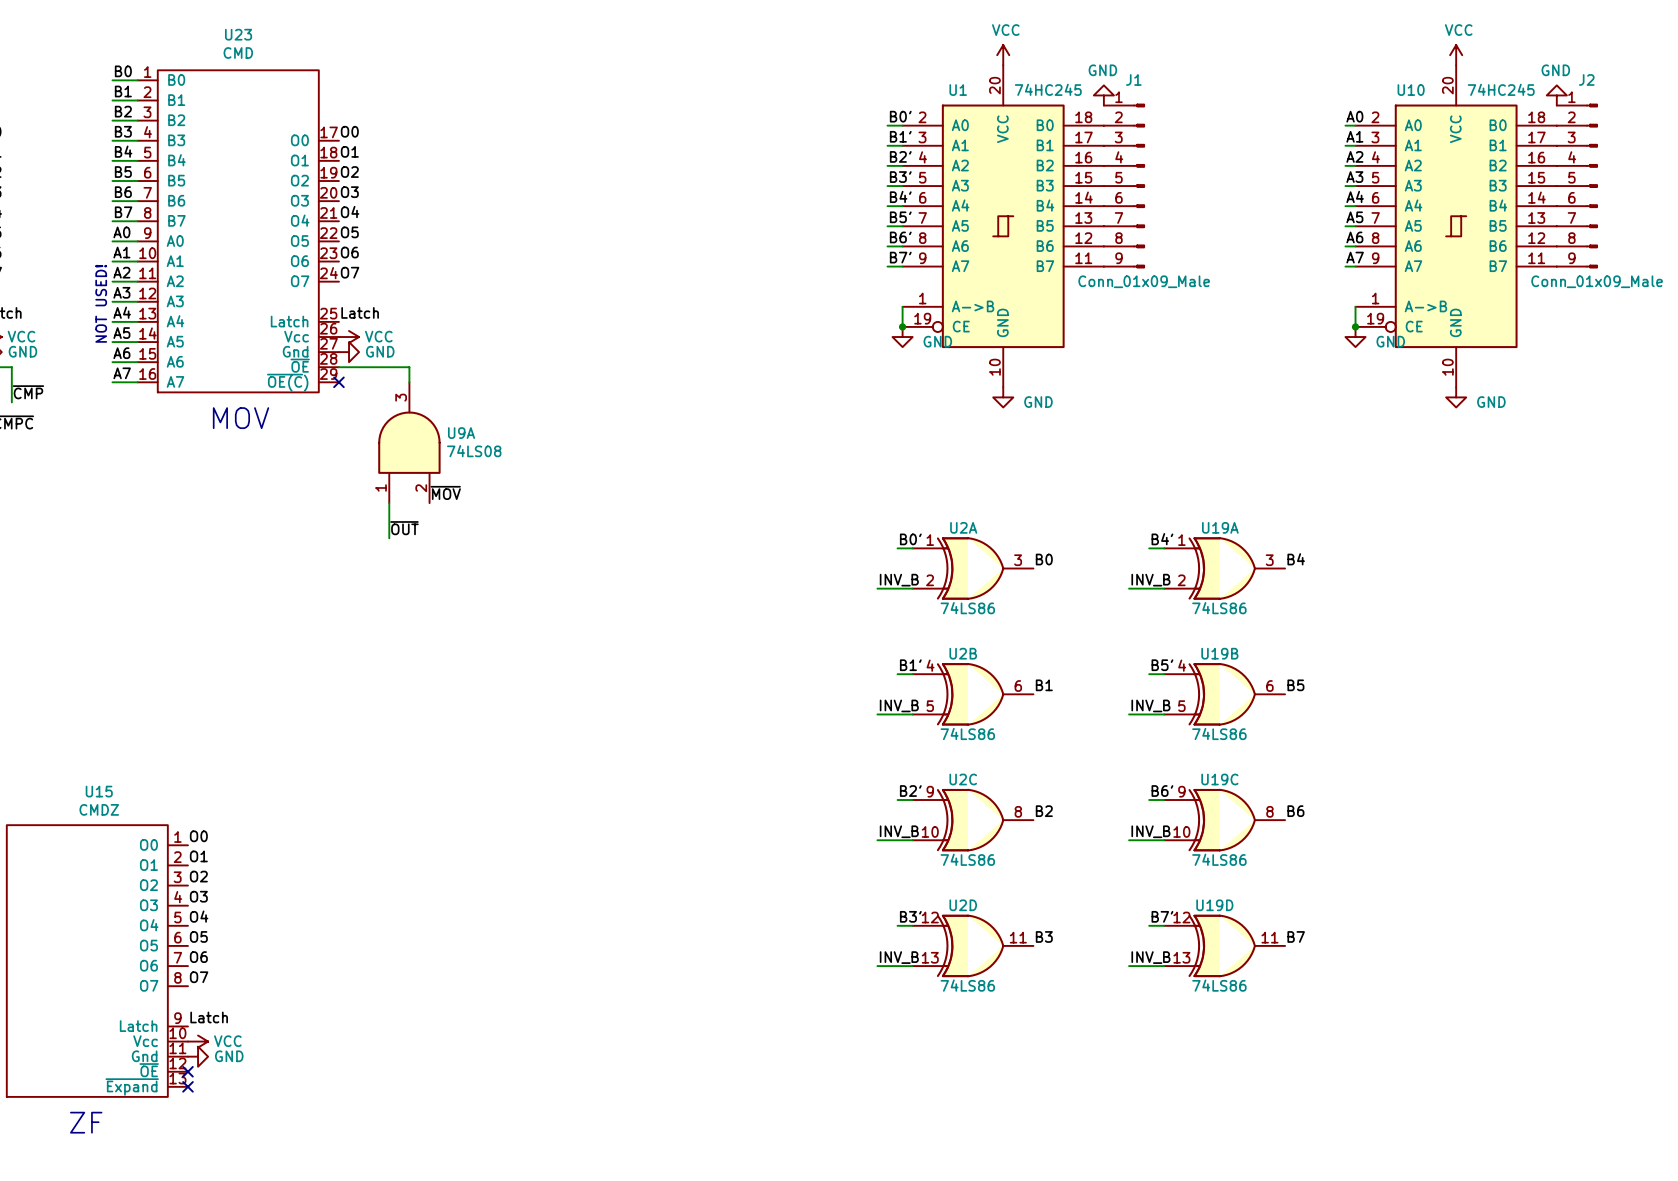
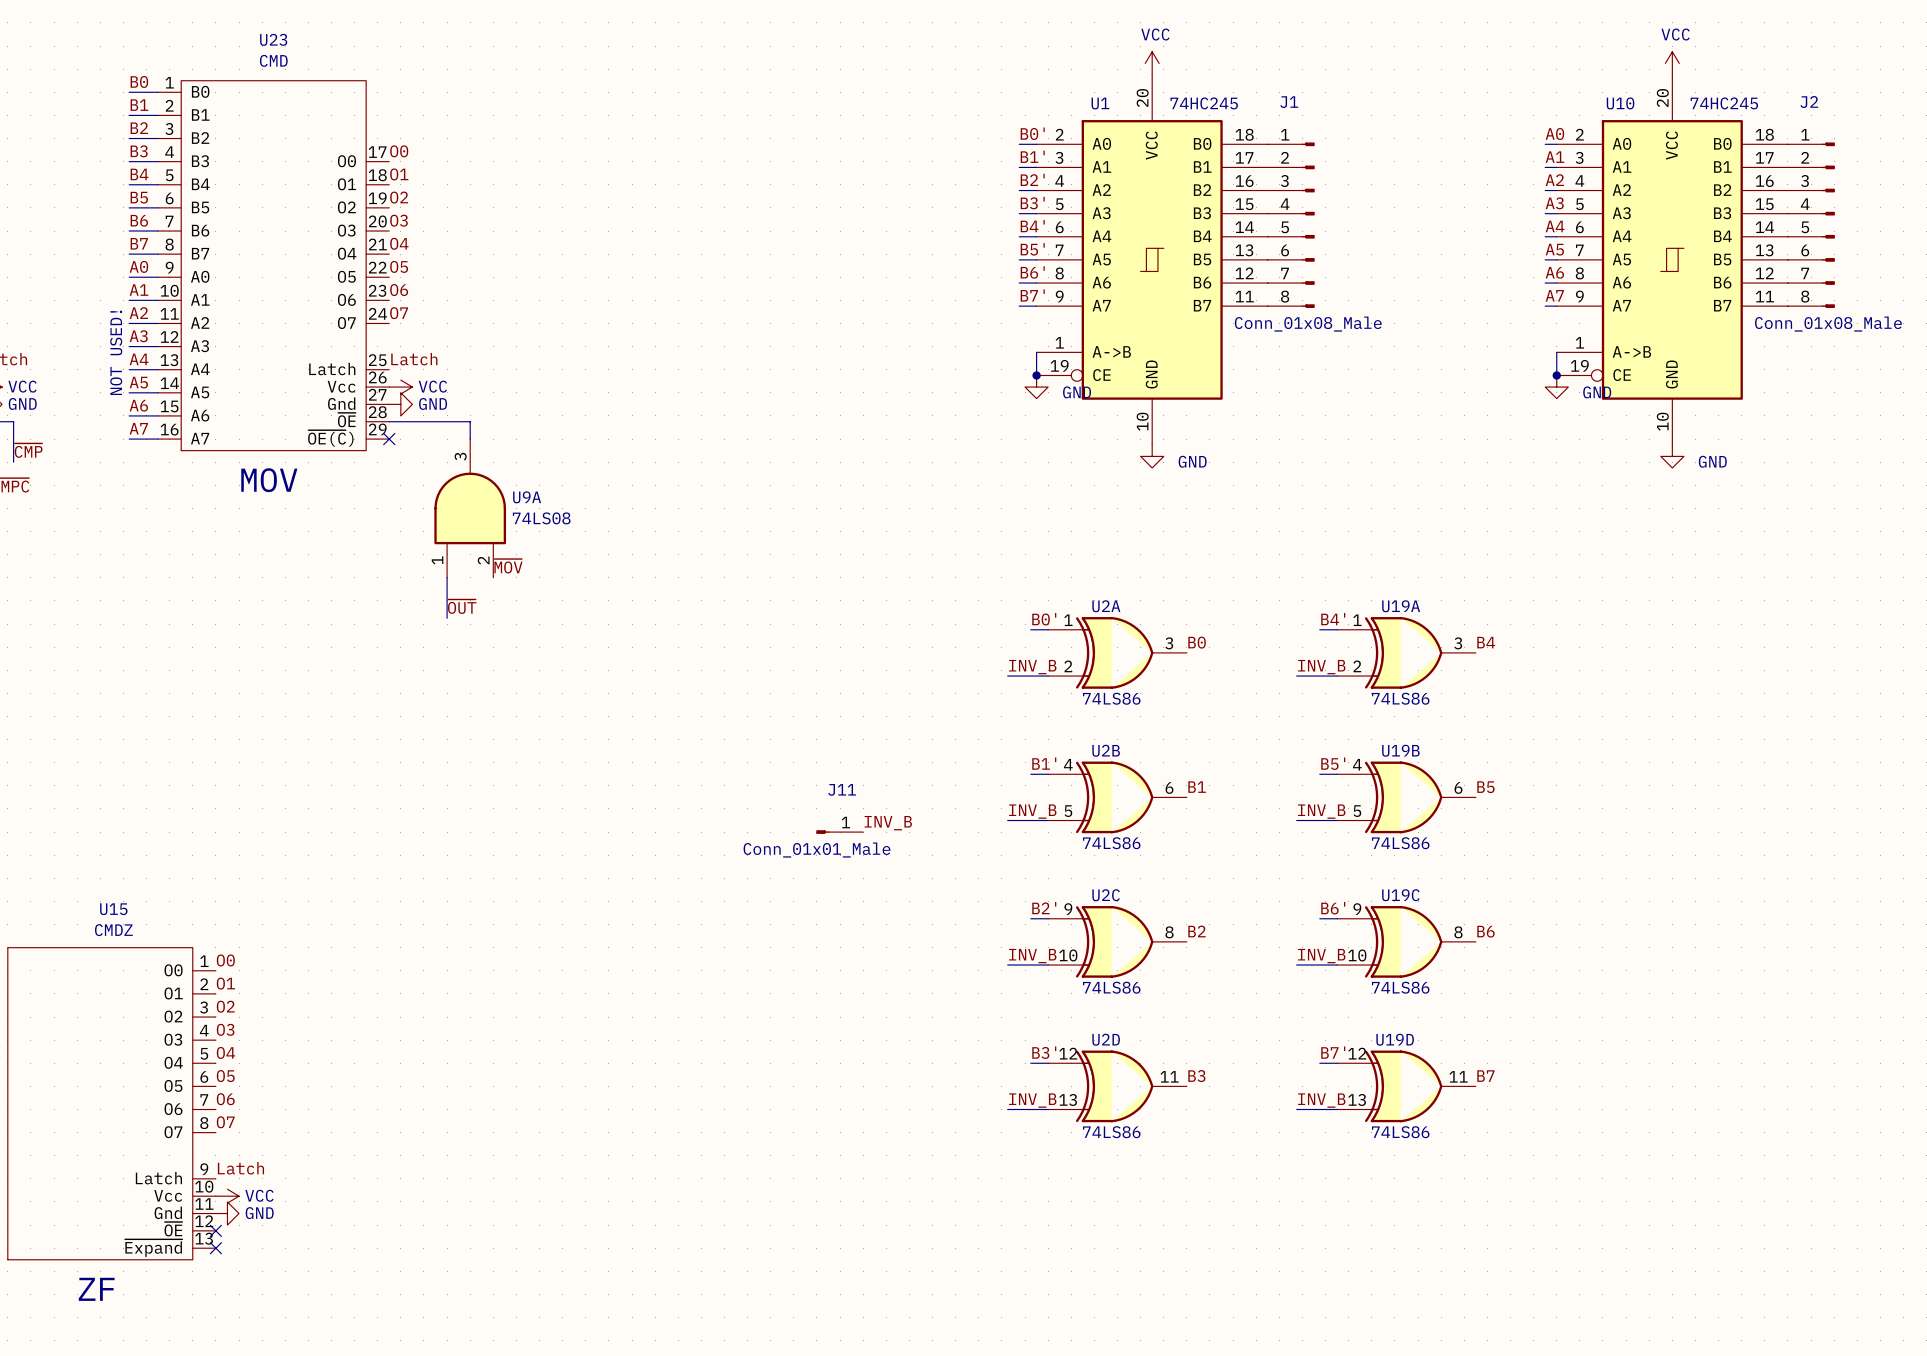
power symbol: GND (1103, 95) -> none
power symbol: GND (1556, 95) -> none
J1 symbol: [1103, 103, 1145, 269] -> [1267, 142, 1315, 308]
J2 symbol: [1556, 103, 1598, 269] -> [1787, 142, 1835, 308]
J1 value: Conn_01x09_Male (1144, 281) -> Conn_01x08_Male (1308, 324)
J2 value: Conn_01x09_Male (1597, 281) -> Conn_01x08_Male (1828, 324)
label: none -> INV_B (888, 823)
J11: none -> Conn_01x01_Male (839, 832)

